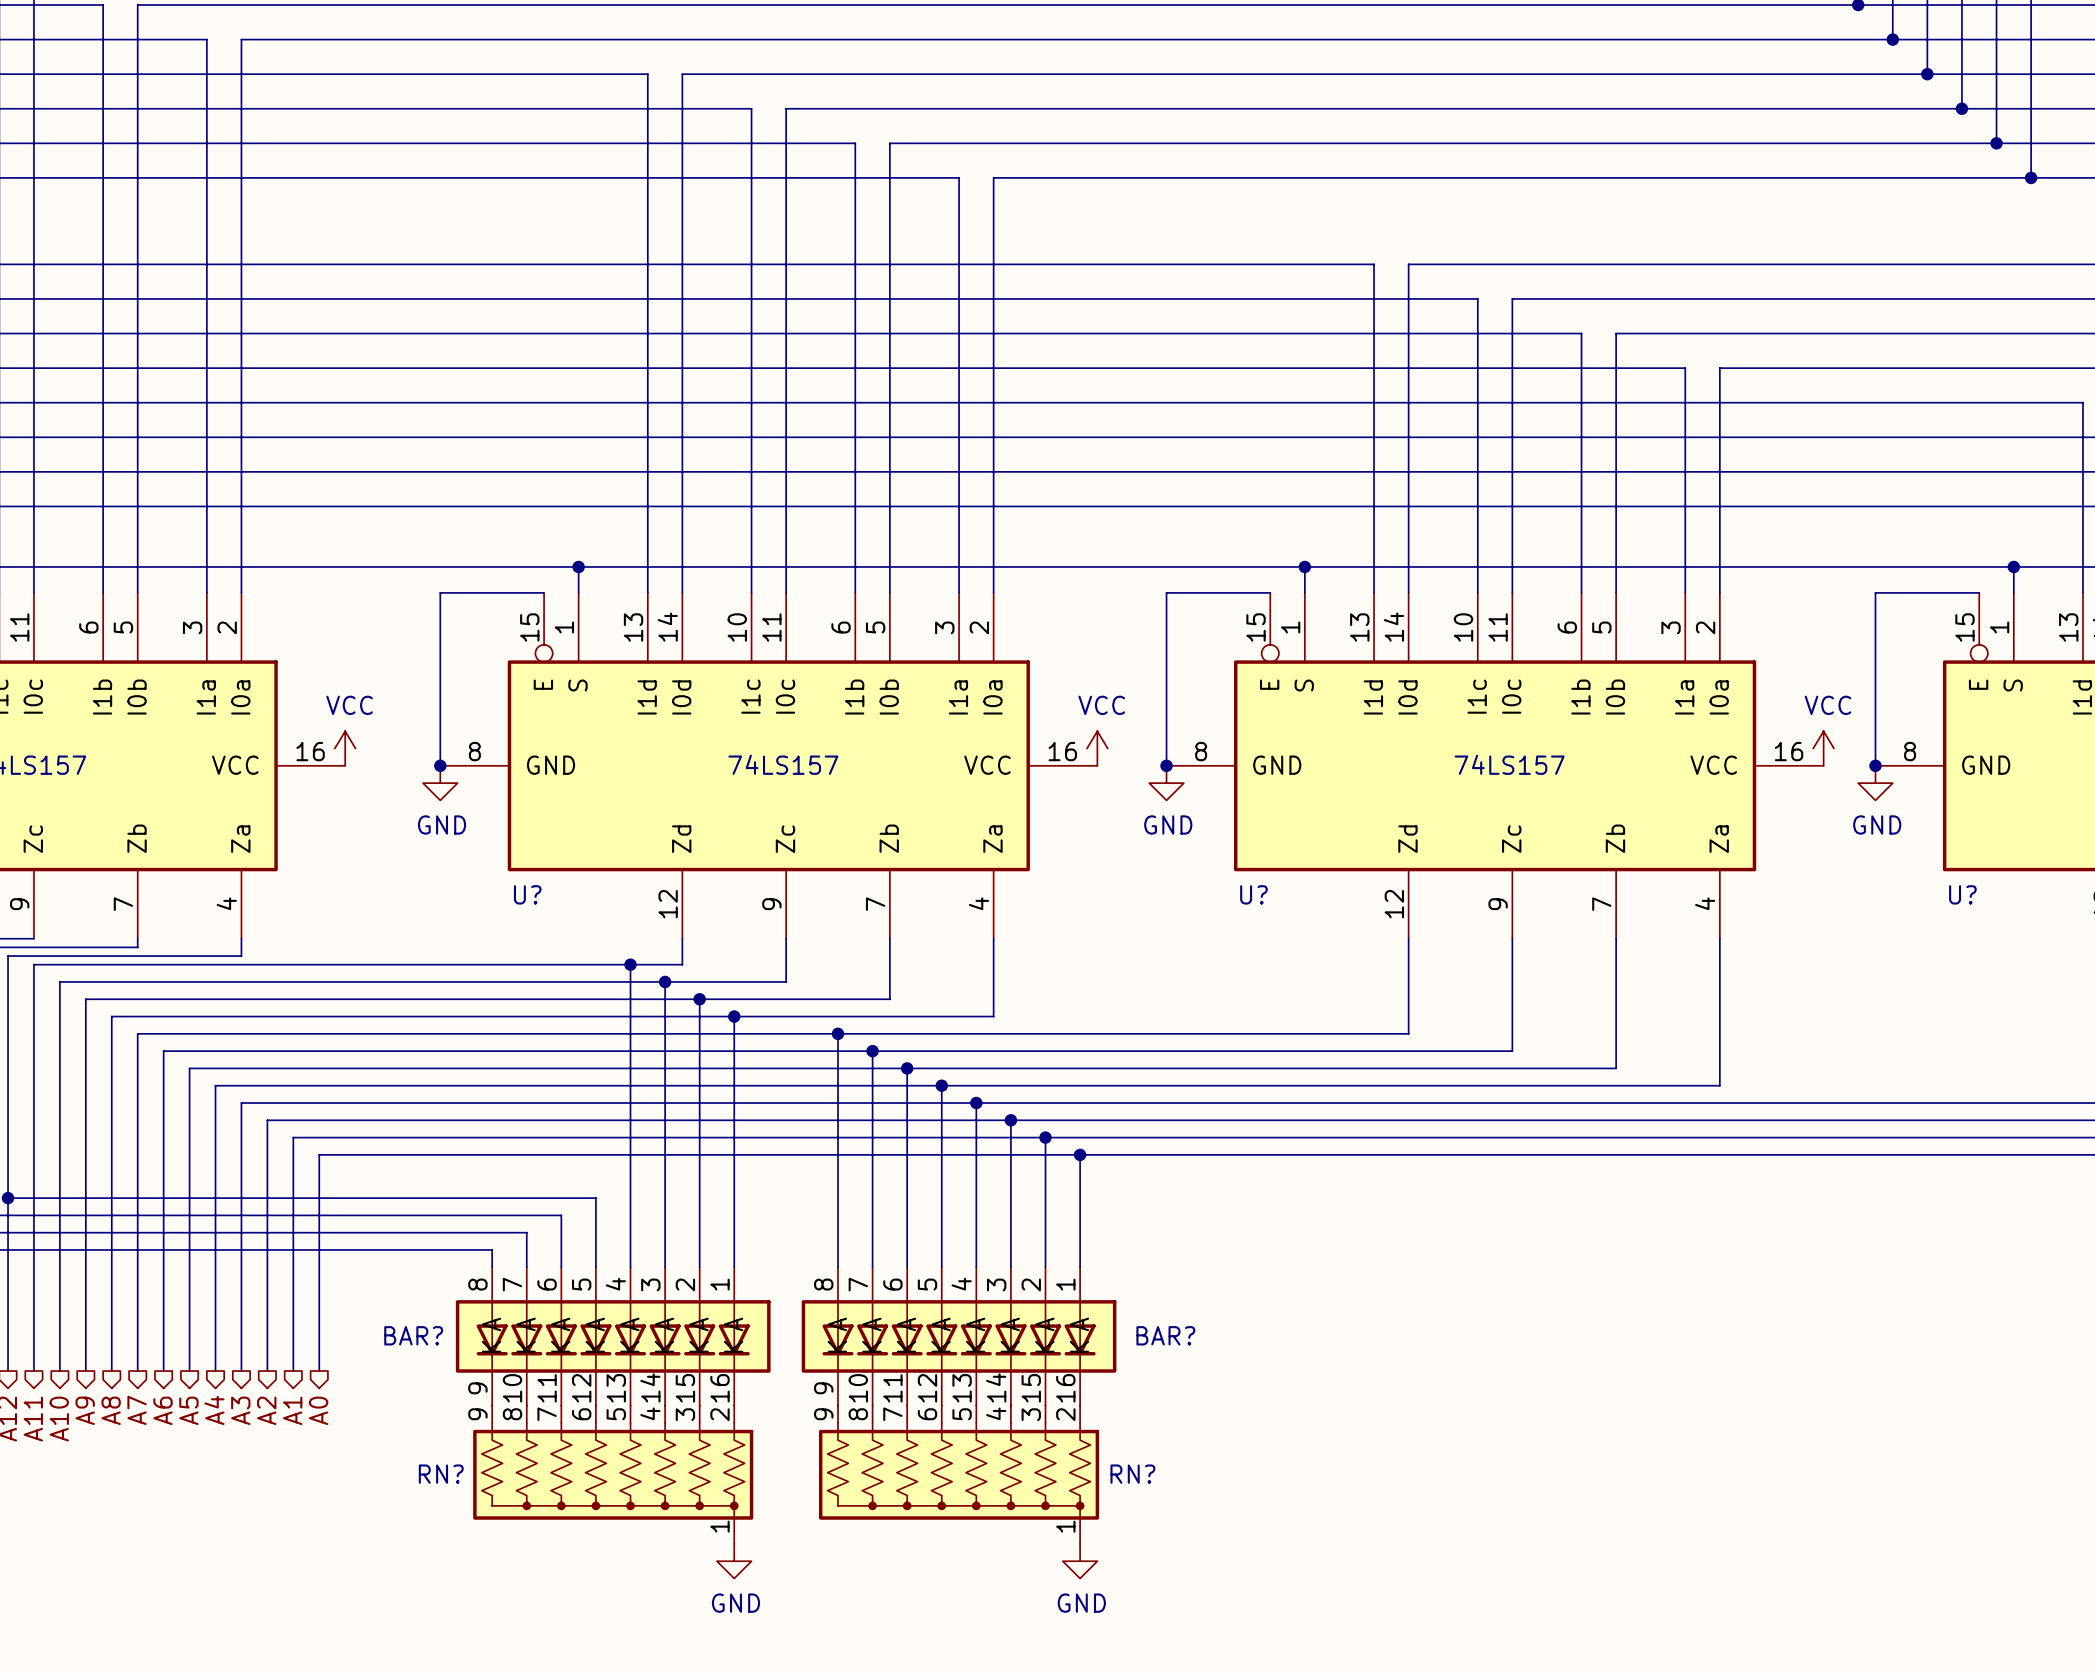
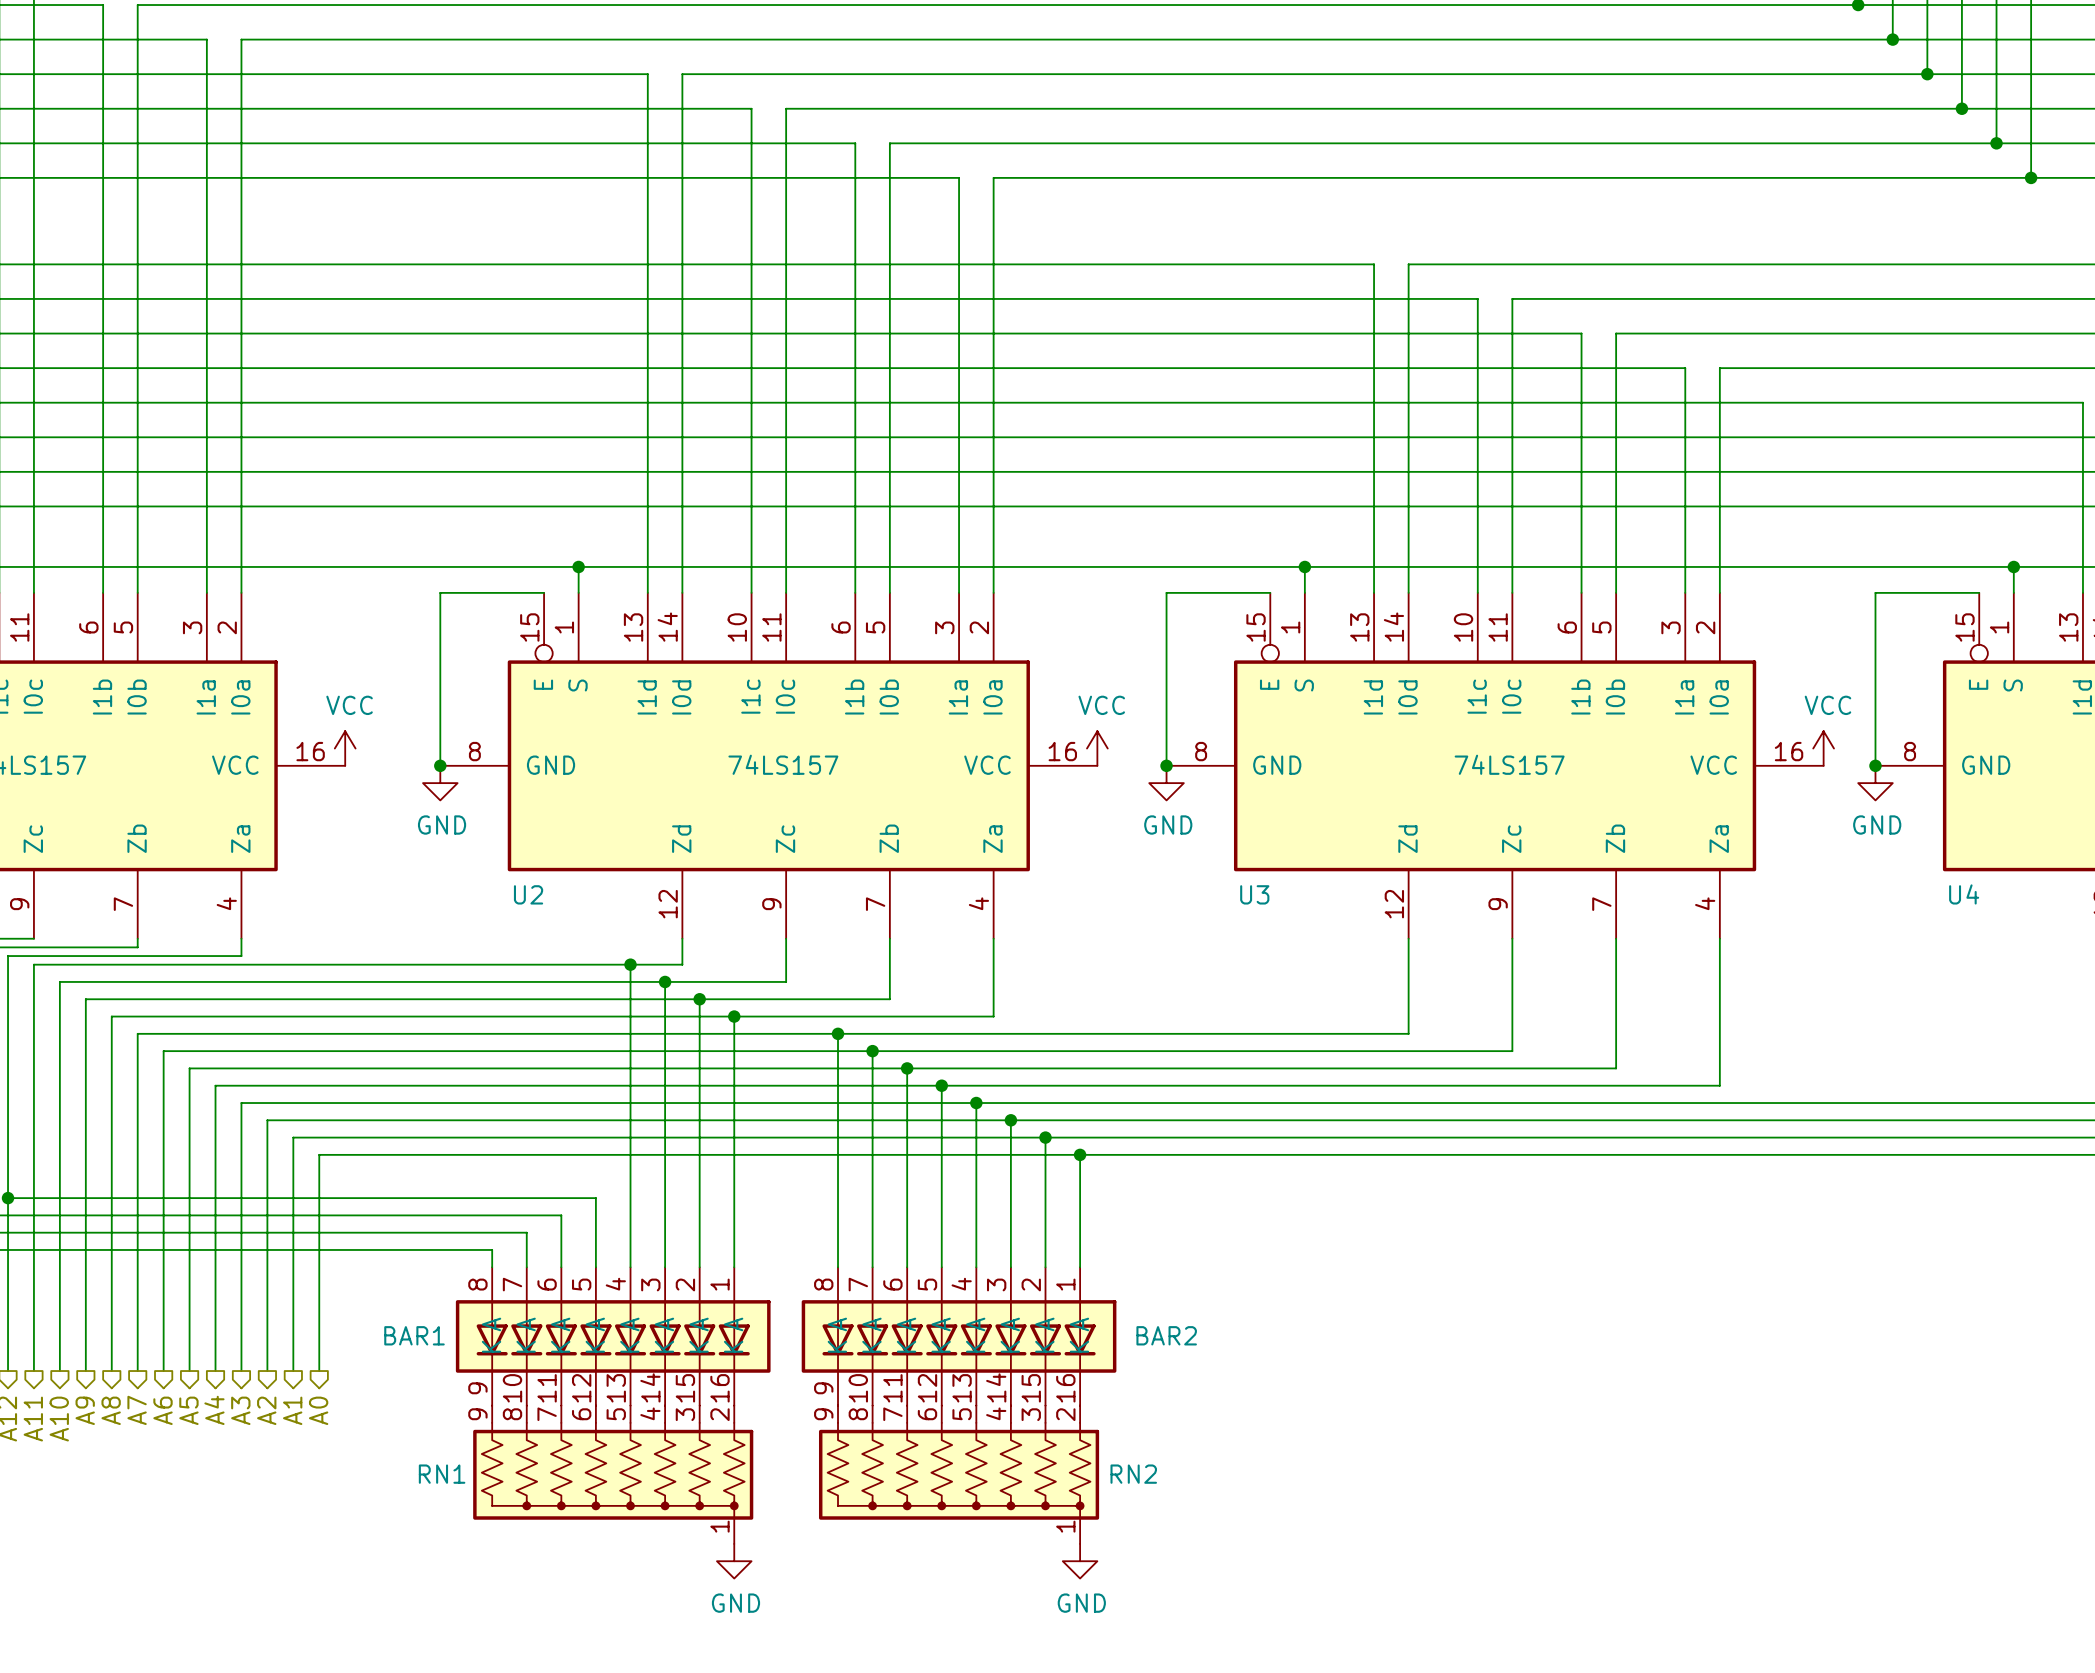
U? name: U? (527, 894) -> U2 (528, 894)
U? name: U? (1253, 894) -> U3 (1254, 894)
U? name: U? (1962, 894) -> U4 (1964, 894)
BAR? name: BAR? (413, 1335) -> BAR1 (414, 1335)
BAR? name: BAR? (1165, 1335) -> BAR2 (1166, 1335)
RN? name: RN? (441, 1474) -> RN1 (442, 1474)
RN? name: RN? (1132, 1474) -> RN2 (1133, 1474)

